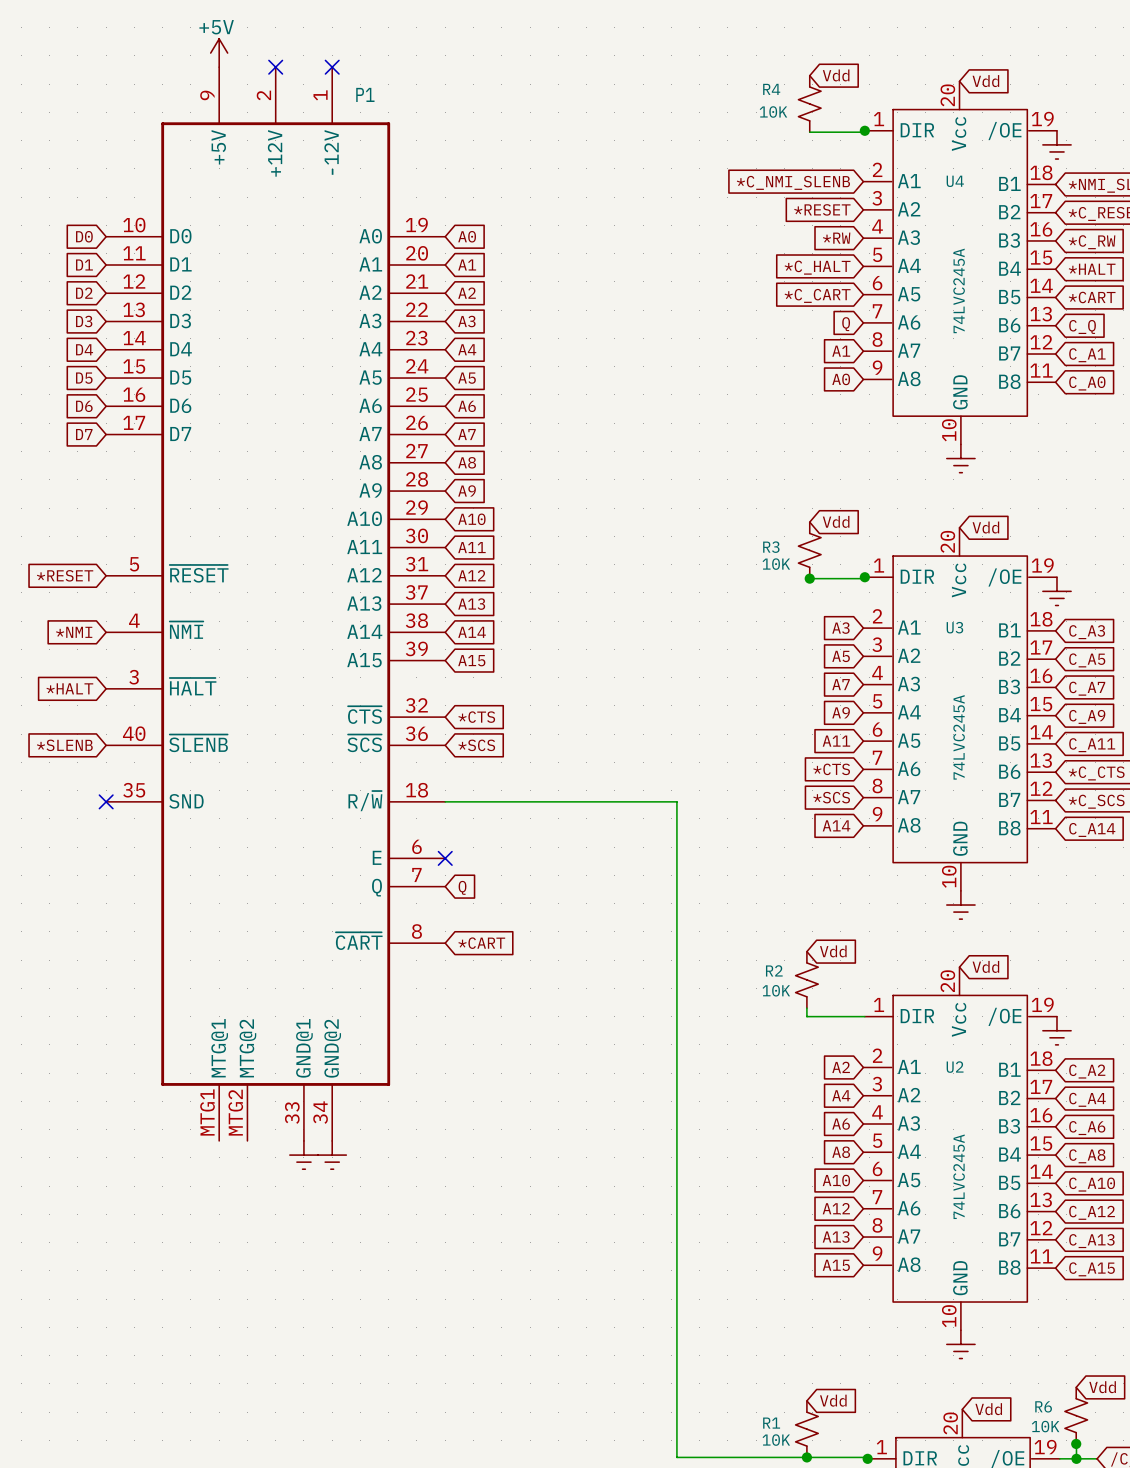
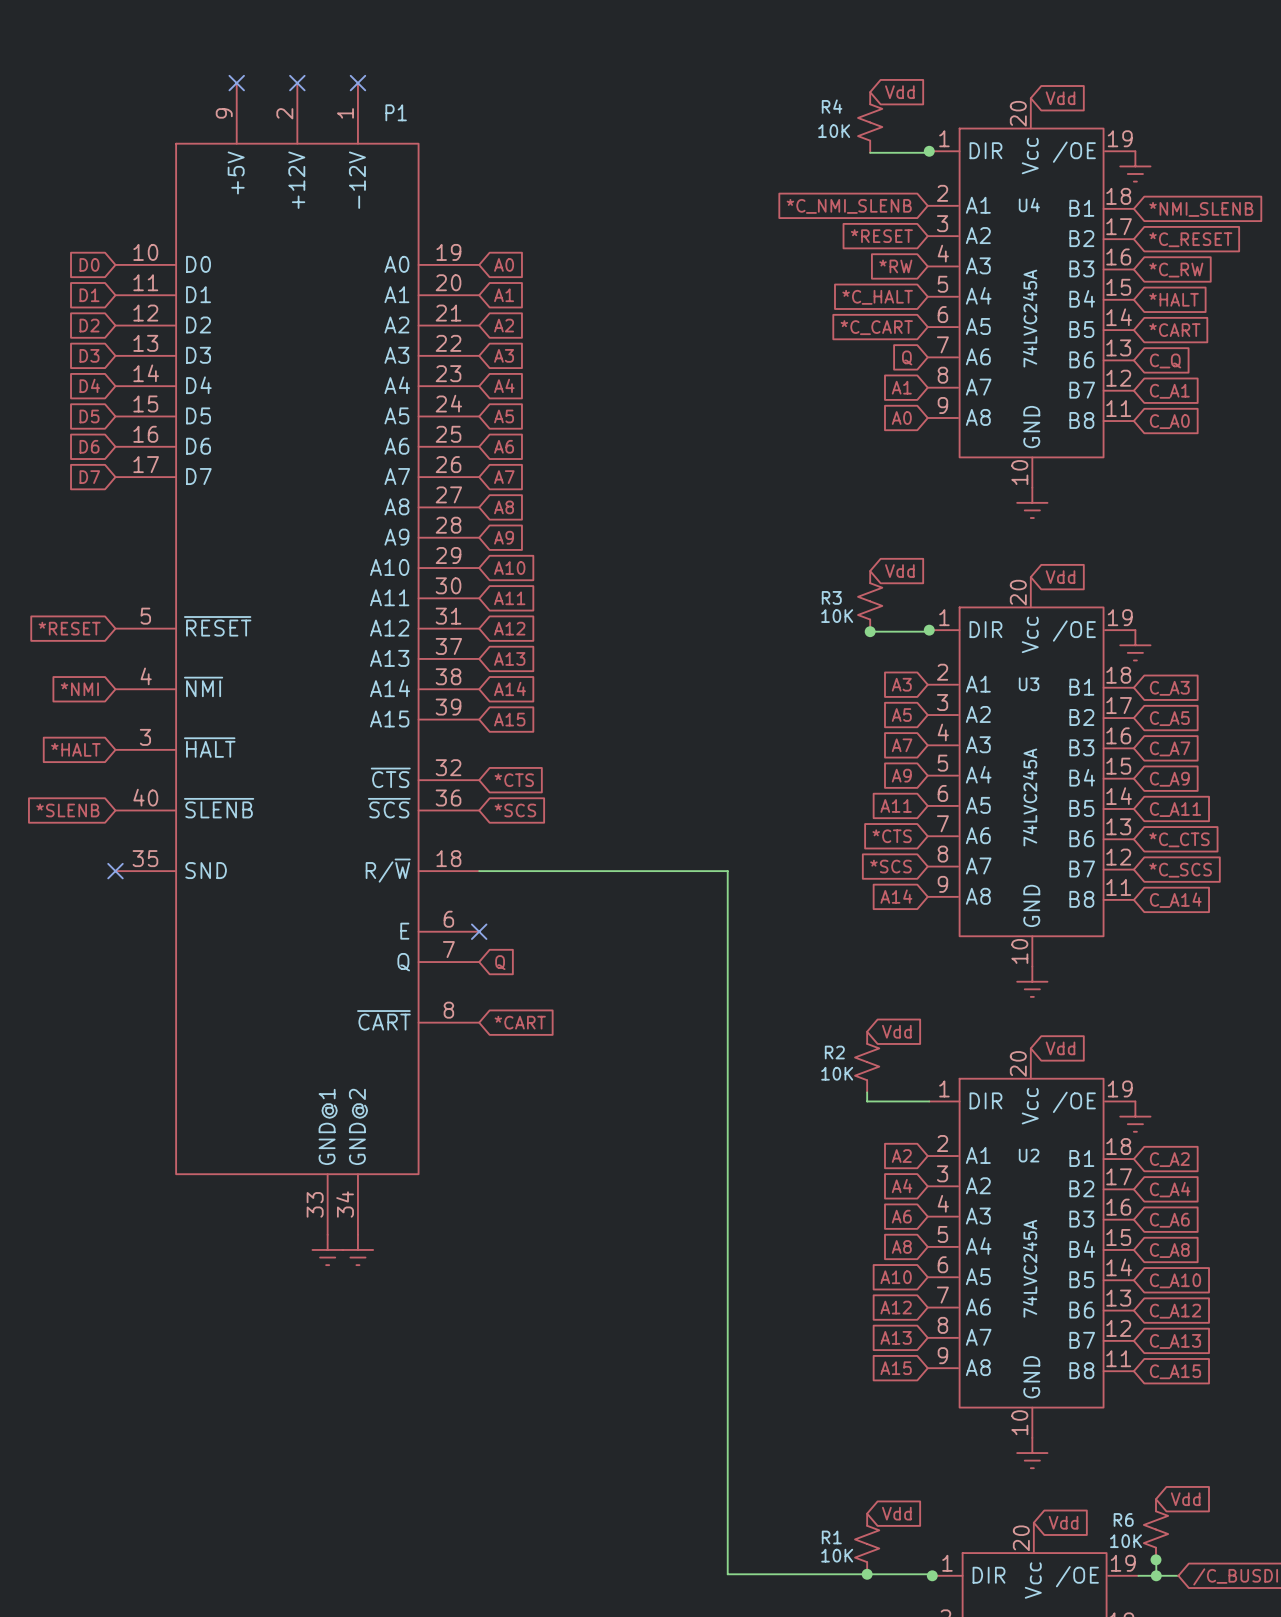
power symbol: +5V (219, 53) -> none
P1 symbol: [106, 67, 446, 1141] -> [115, 83, 480, 1235]
no-connect mark: none -> (236, 83)

